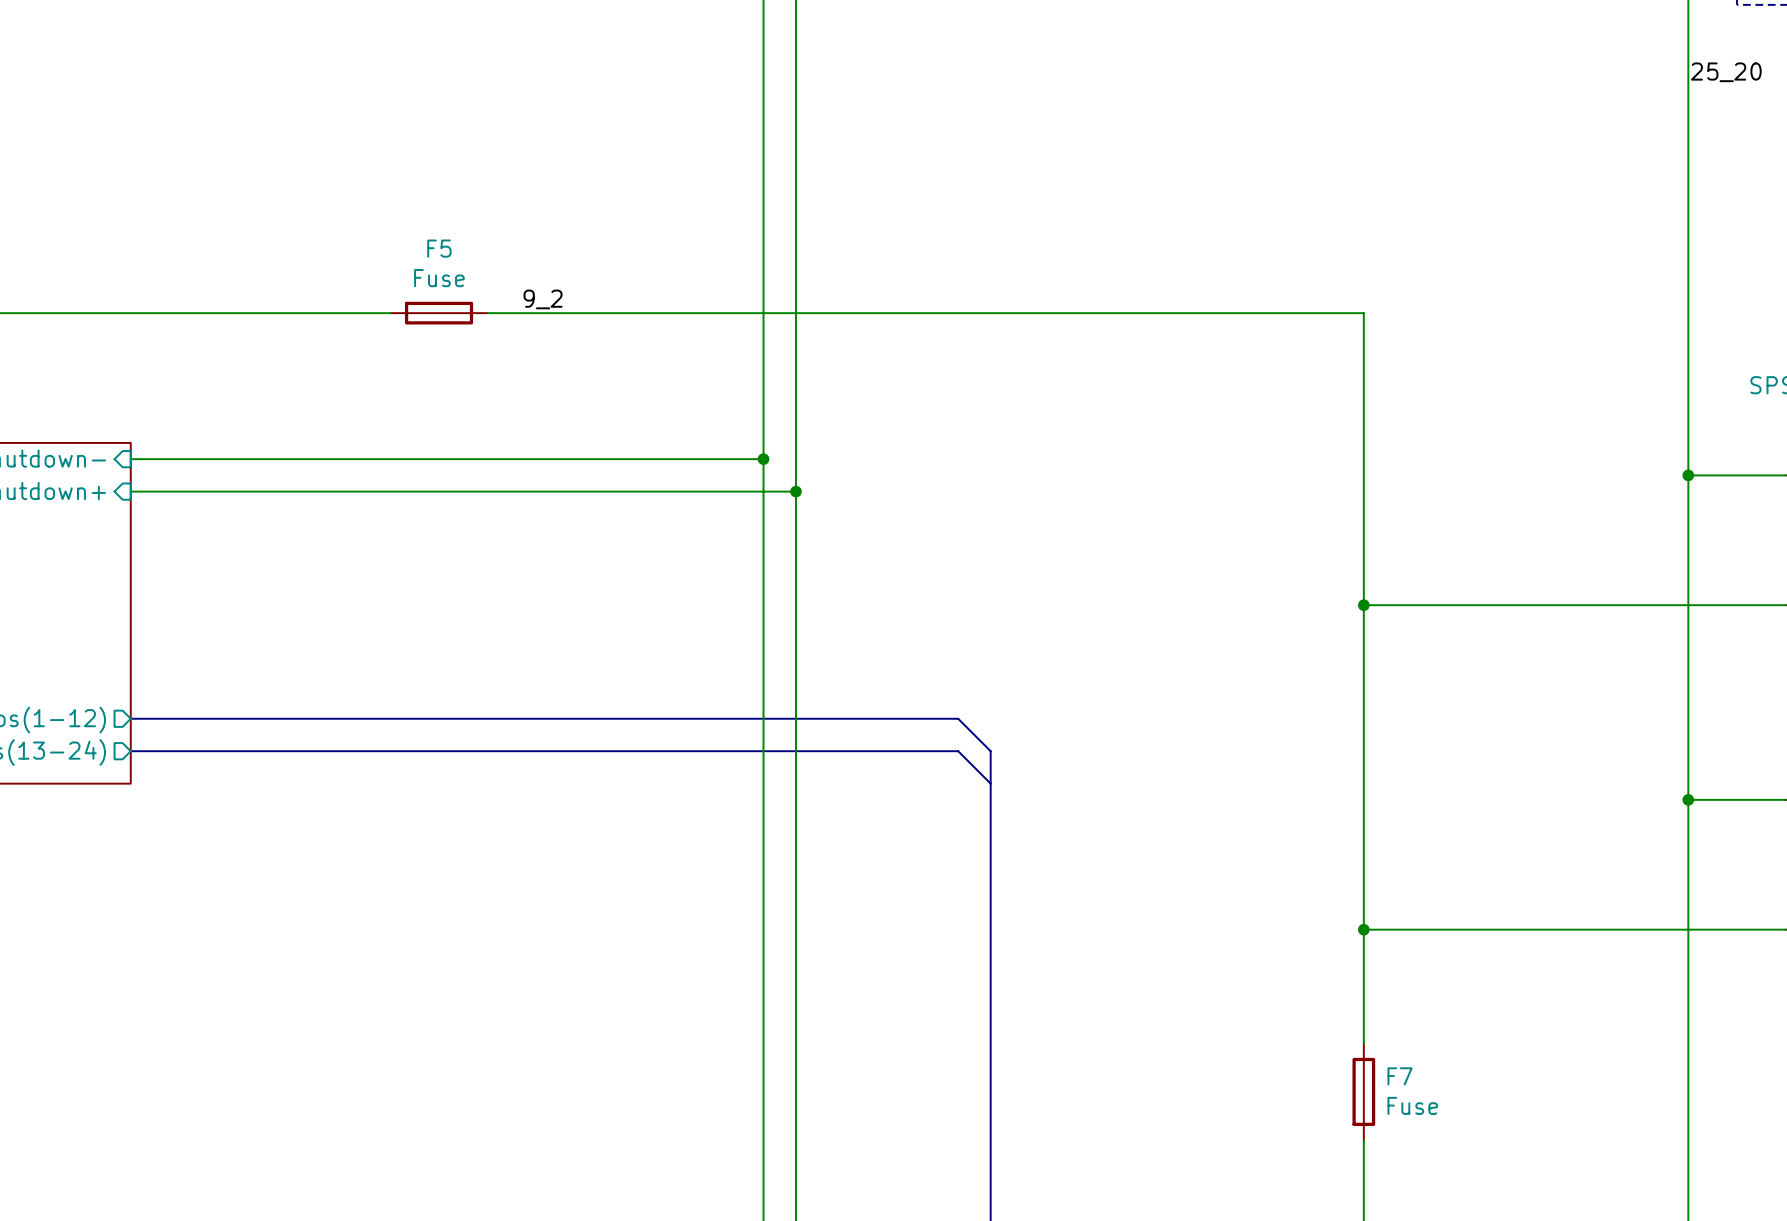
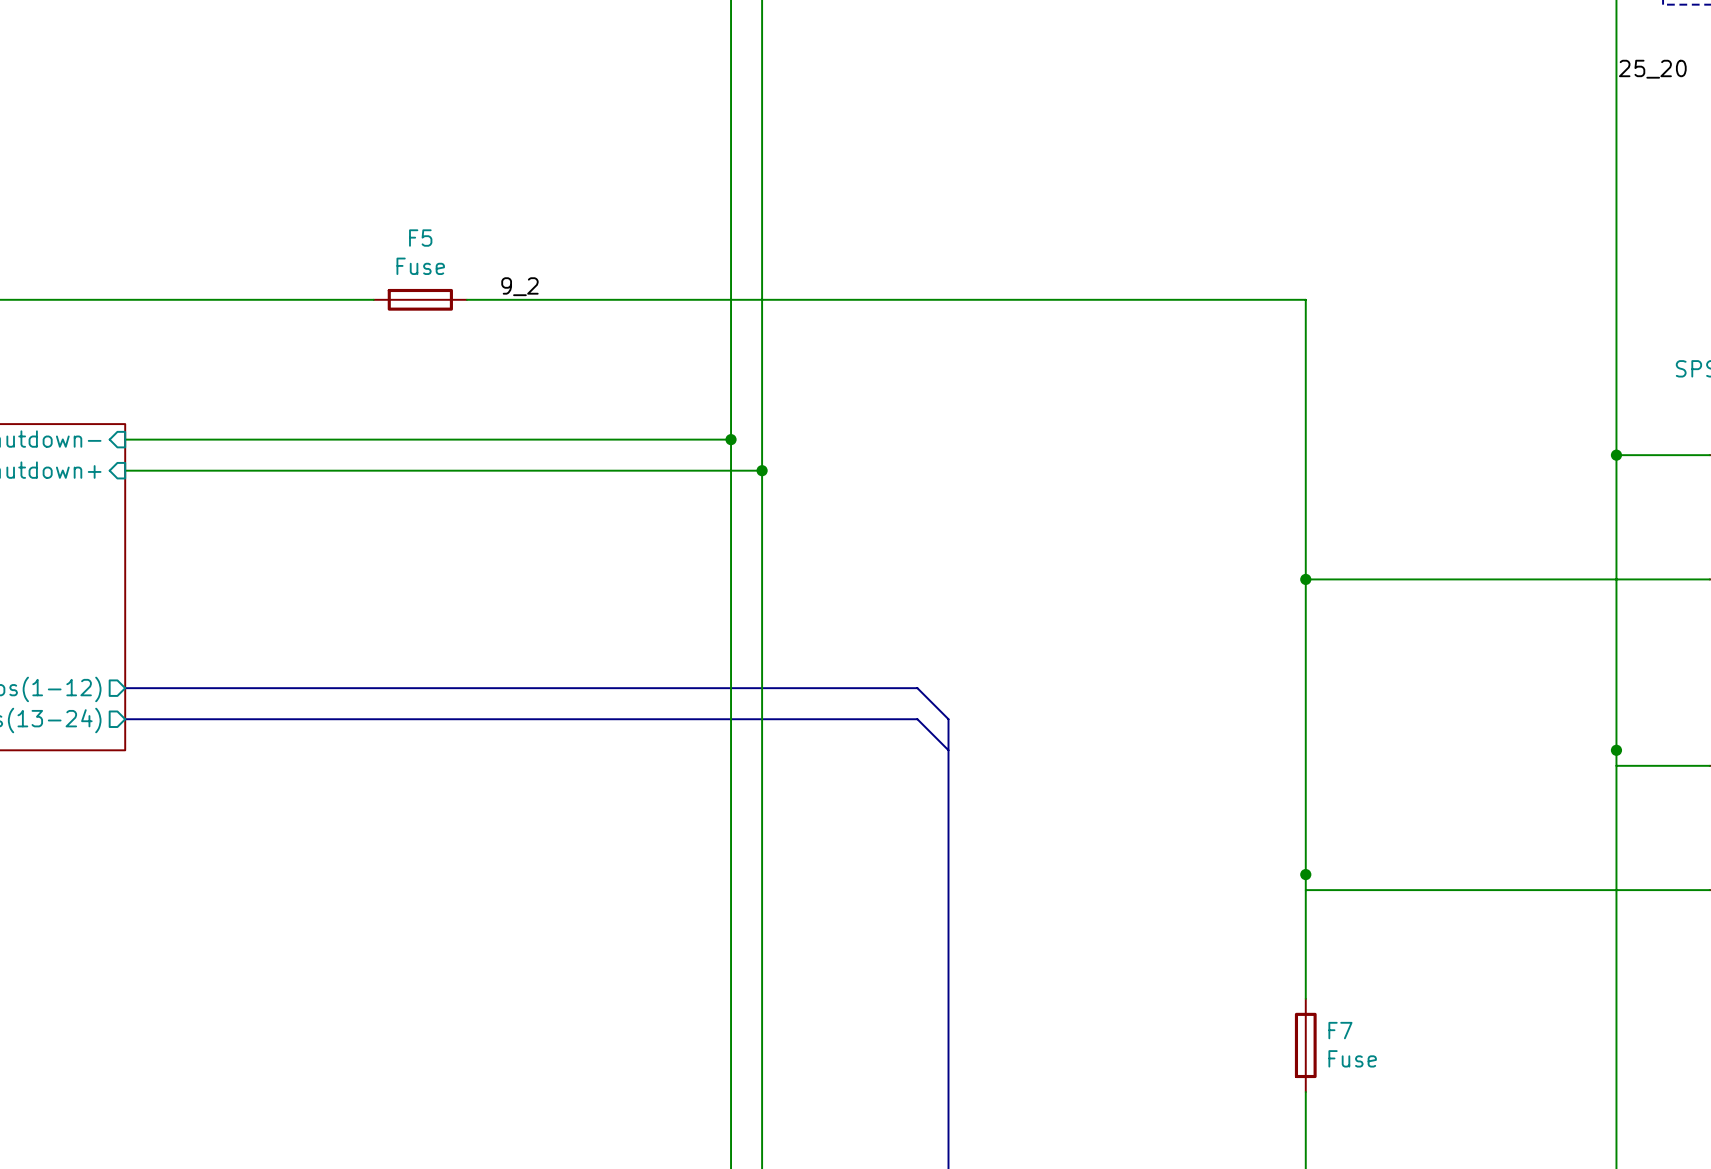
junction position: (1688, 799) -> (1616, 750)
junction position: (1363, 929) -> (1305, 874)

